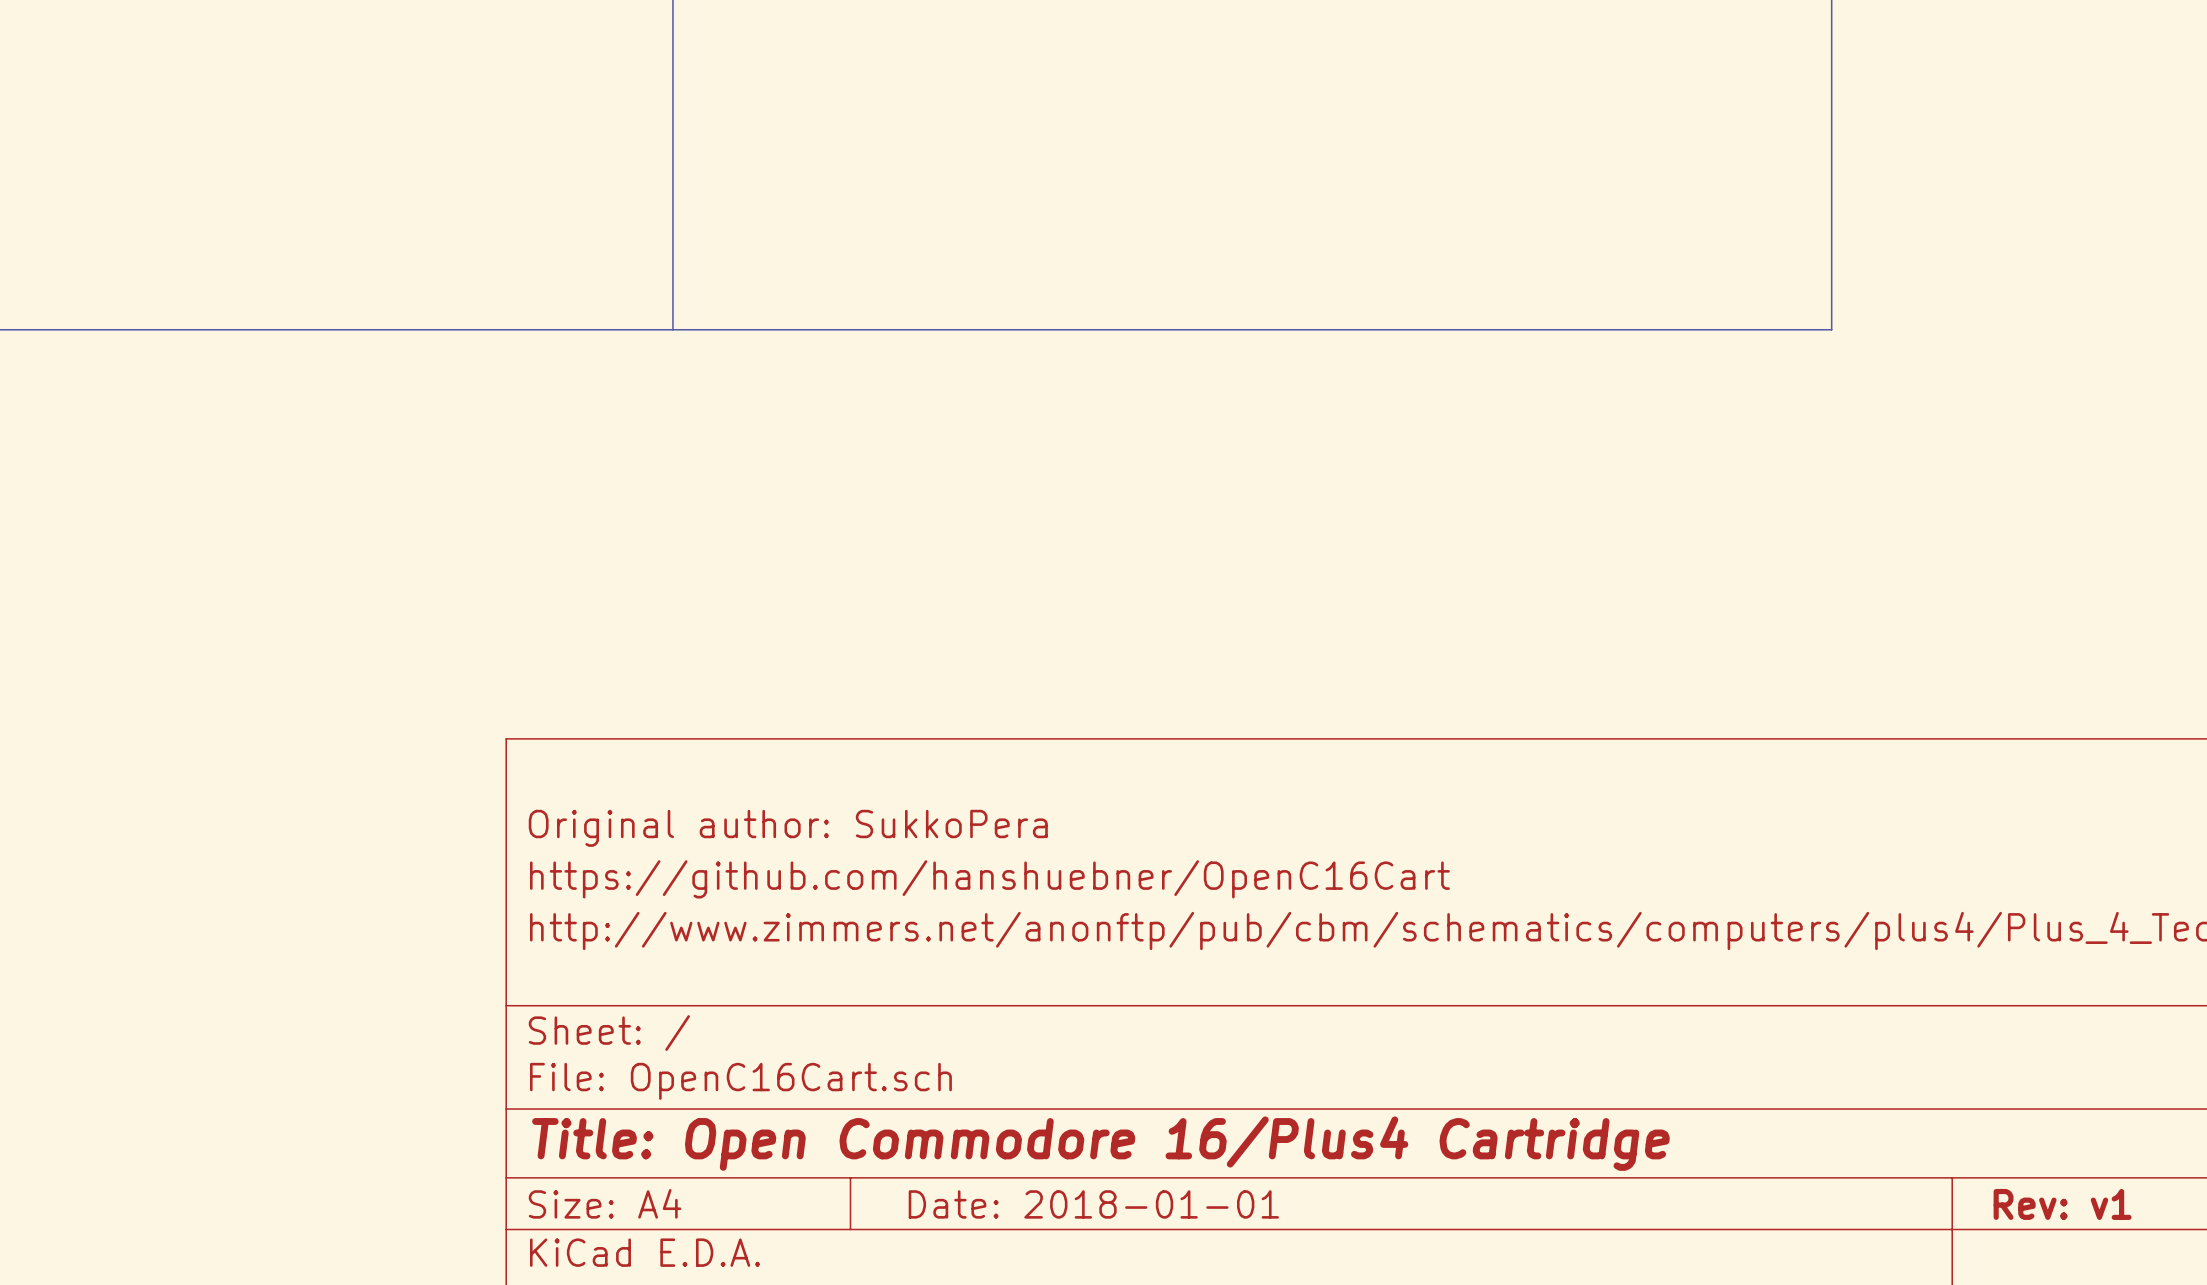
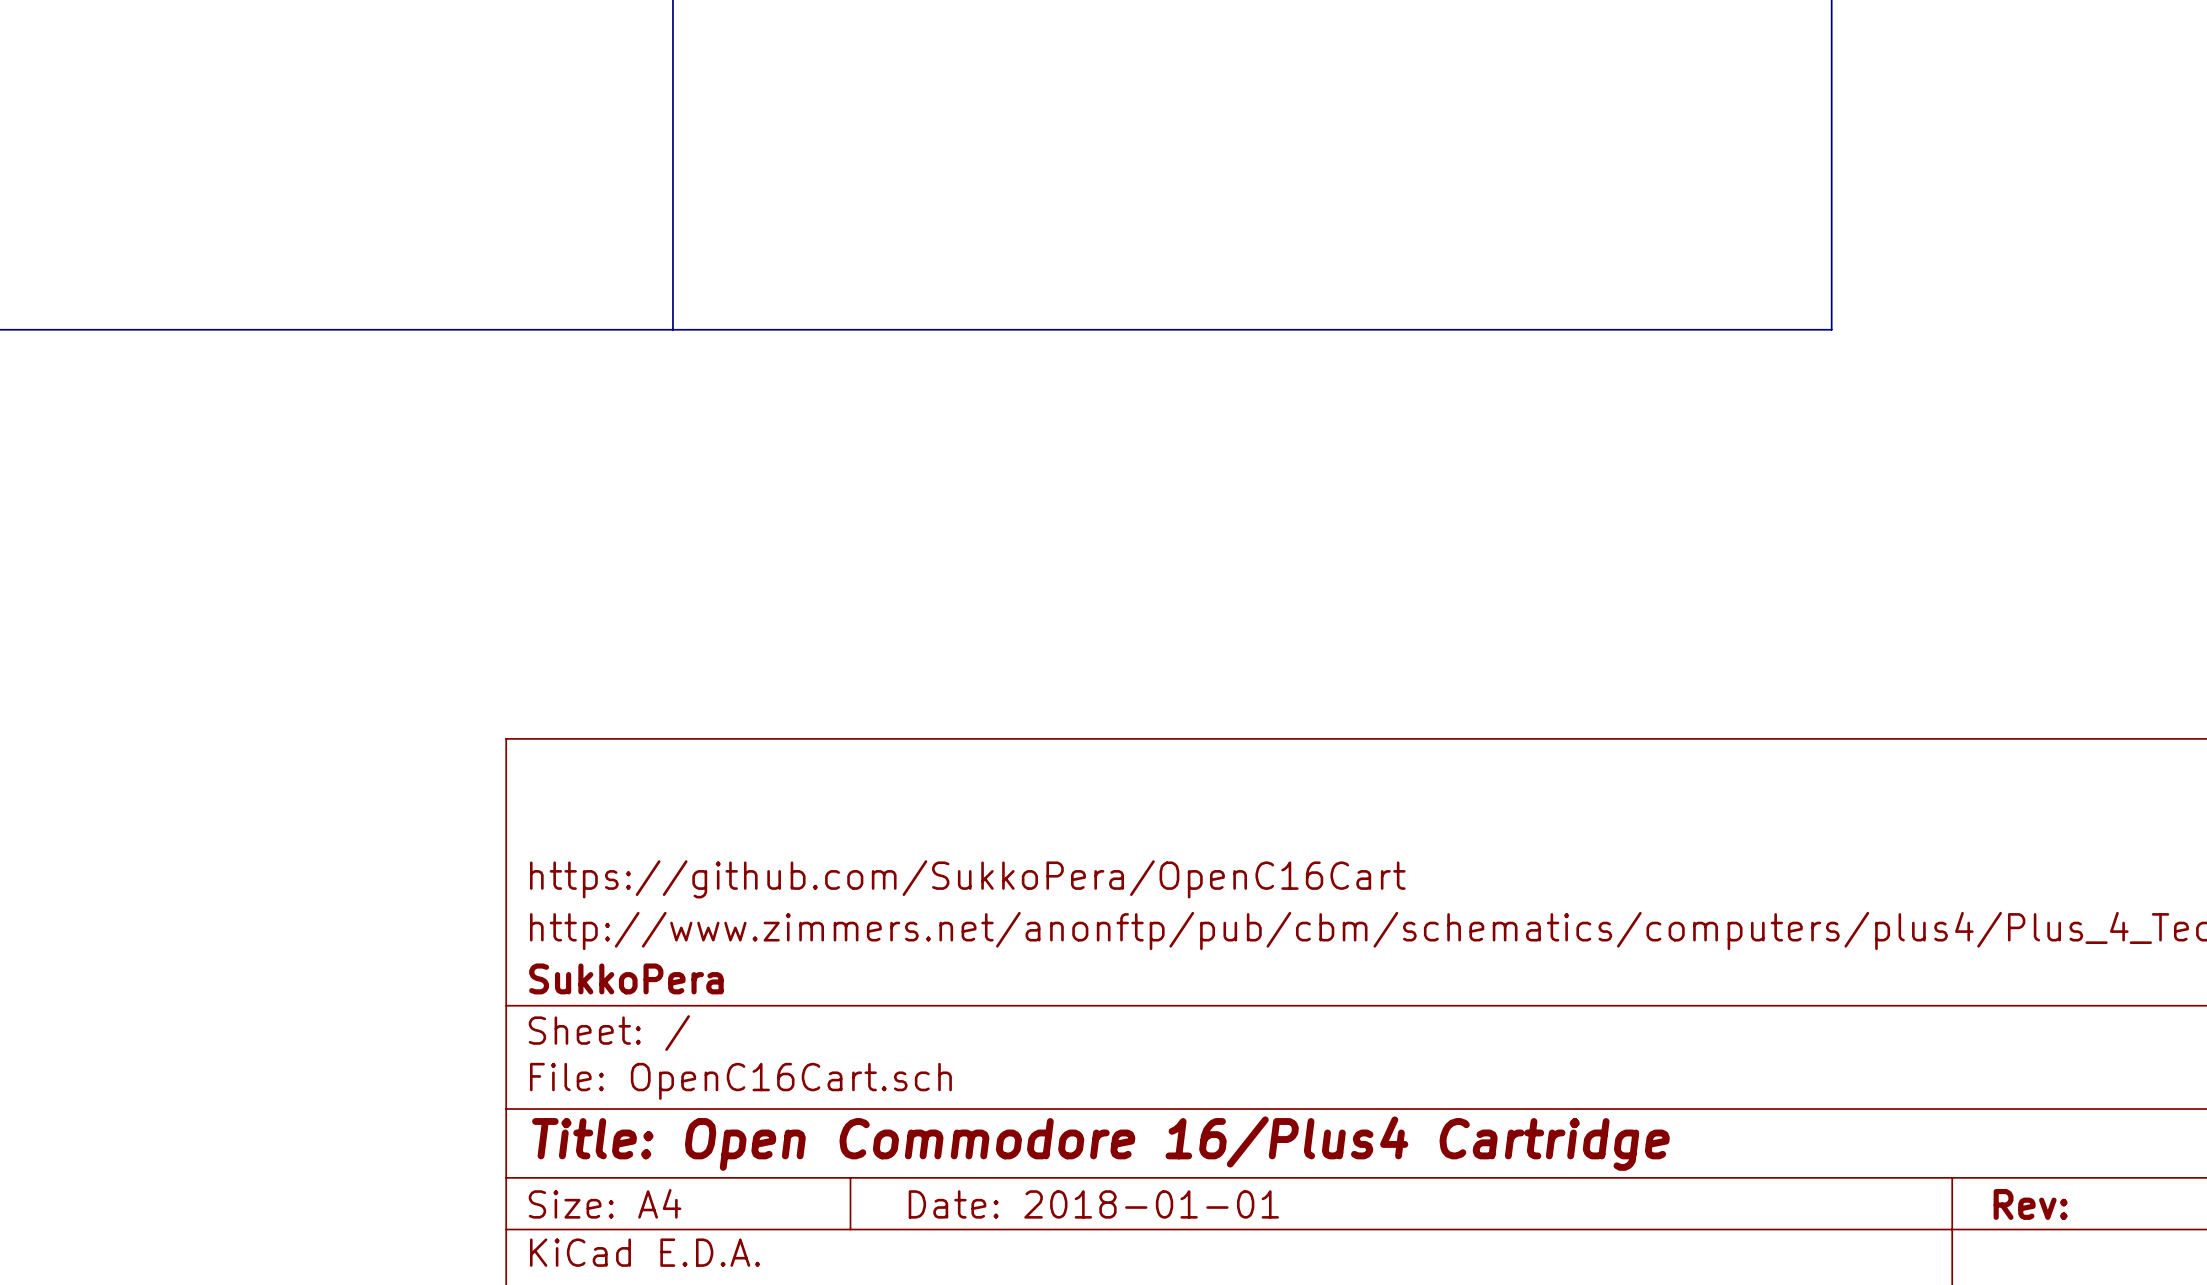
title block: Original author: SukkoPera (788, 828) -> none
title block: https://github.com/hanshuebner/OpenC16Cart (989, 879) -> https://github.com/SukkoPera/OpenC16Cart (967, 879)
title block: none -> SukkoPera (626, 978)
title block: Rev: v1 (2062, 1204) -> Rev: (2030, 1204)

